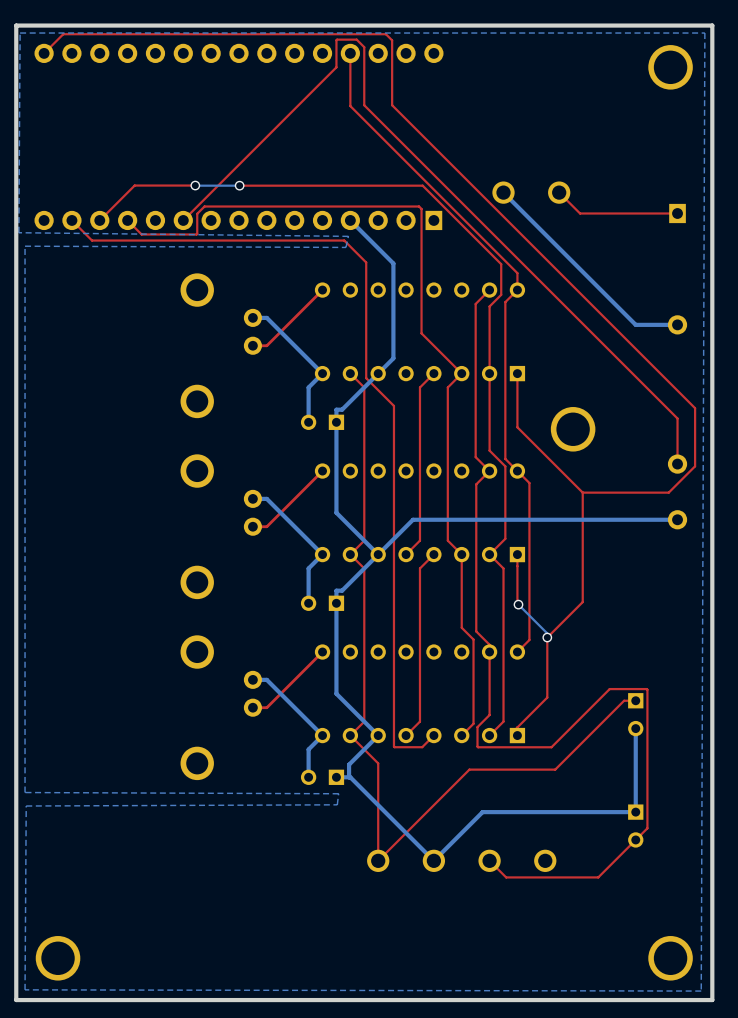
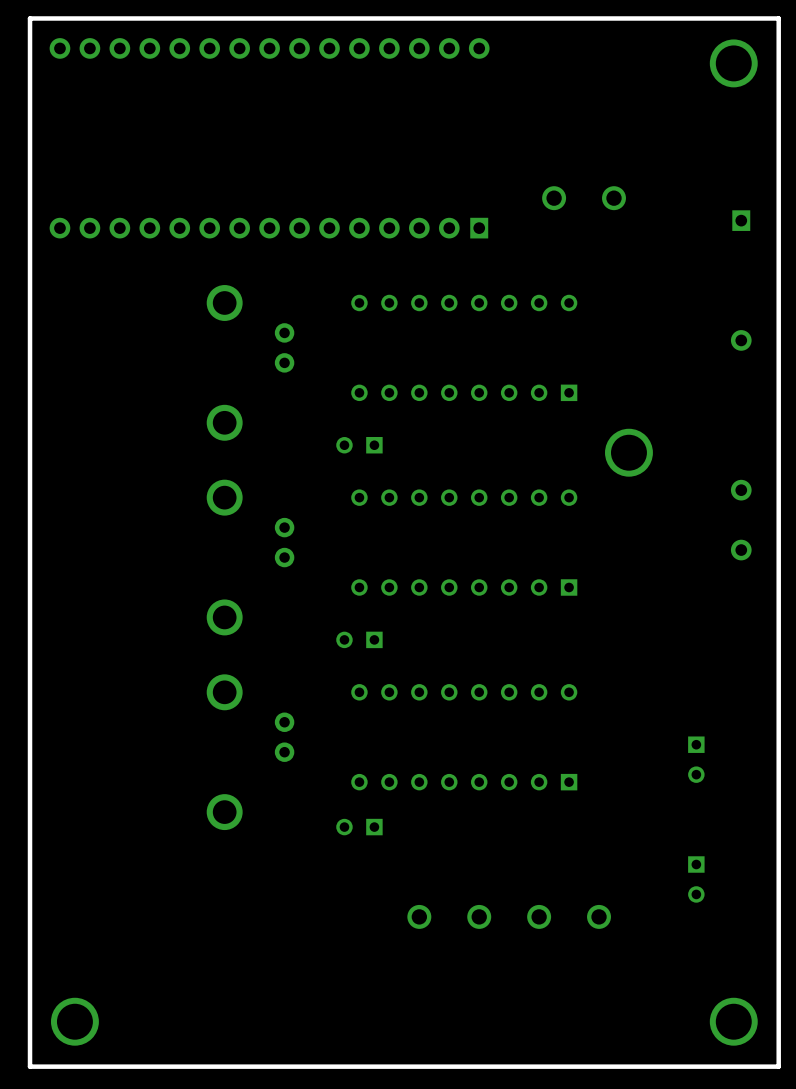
bottom zone outline: (704, 33) (20, 33) (18, 232) (348, 236) (346, 247) (25, 246) (25, 792) (338, 793) (337, 804) (26, 806) (25, 989) (701, 991) (704, 33) -> none
top track: (44, 53) (63, 34) (385, 34) (392, 40) (392, 105) (695, 408) (695, 466) (668, 492) (582, 492) -> none
top track: (350, 53) (350, 106) (517, 273) (517, 290) (505, 302) (505, 458) (529, 483) (529, 640) (517, 652) -> none
top track: (195, 185) (134, 185) (99, 220) -> none
via: (195, 185) -> none
bottom track: (239, 185) (195, 185) -> none
top track: (239, 185) (422, 185) (501, 264) (501, 294) (489, 306) (489, 450) (505, 466) (505, 538) (489, 554) (503, 568) (503, 721) (489, 735) -> none
via: (239, 185) -> none
bottom track: (503, 192) (635, 324) (677, 324) -> none
top track: (559, 192) (580, 213) (677, 213) -> none
top track: (71, 220) (92, 240) (344, 240) (366, 262) (366, 378) (393, 405) (393, 746) (422, 747) (433, 735) -> none
top track: (127, 220) (141, 234) (196, 234) (197, 213) (204, 206) (419, 206) (421, 208) (421, 333) (461, 373) (447, 387) (447, 540) (461, 554) (461, 627) (473, 639) (473, 723) (461, 735) -> none
top track: (183, 220) (336, 67) (336, 40) (356, 39) (364, 47) (364, 105) (677, 418) (677, 464) -> none
bottom track: (350, 220) (393, 263) (393, 358) (342, 409) (336, 409) (336, 512) (378, 554) -> none
top track: (322, 290) (266, 345) (252, 345) -> none
top track: (489, 290) (475, 303) (475, 457) (489, 471) (476, 484) (476, 631) (489, 644) (489, 715) (477, 727) (477, 746) (551, 747) (609, 689) (647, 689) (647, 828) (598, 877) (506, 877) (489, 860) -> none
bottom track: (252, 317) (266, 317) (322, 373) (308, 387) (308, 422) -> none
top track: (350, 373) (364, 387) (364, 540) (350, 554) (364, 568) (364, 721) (350, 735) (378, 763) (378, 860) (469, 769) (555, 769) (624, 700) (635, 700) -> none
top track: (433, 373) (419, 387) (419, 540) (406, 554) -> none
top track: (517, 373) (517, 427) (582, 492) -> none
top track: (322, 471) (266, 526) (252, 526) -> none
top track: (582, 492) (582, 602) (547, 637) (547, 697) (515, 729) -> none
bottom track: (252, 498) (266, 498) (322, 554) (308, 568) (308, 603) -> none
bottom track: (677, 519) (413, 519) (342, 590) (336, 590) (336, 693) (378, 735) (349, 764) (349, 777) -> none
top track: (433, 554) (419, 568) (419, 721) (406, 735) -> none
top track: (517, 554) (518, 604) -> none
bottom track: (518, 604) (547, 633) (547, 637) -> none
via: (518, 604) -> none
via: (547, 637) -> none
top track: (322, 652) (266, 707) (252, 707) -> none
bottom track: (252, 679) (266, 679) (322, 735) (308, 749) (308, 777) -> none
bottom track: (635, 728) (635, 812) (482, 812) (433, 860) (350, 777) (336, 777) -> none

